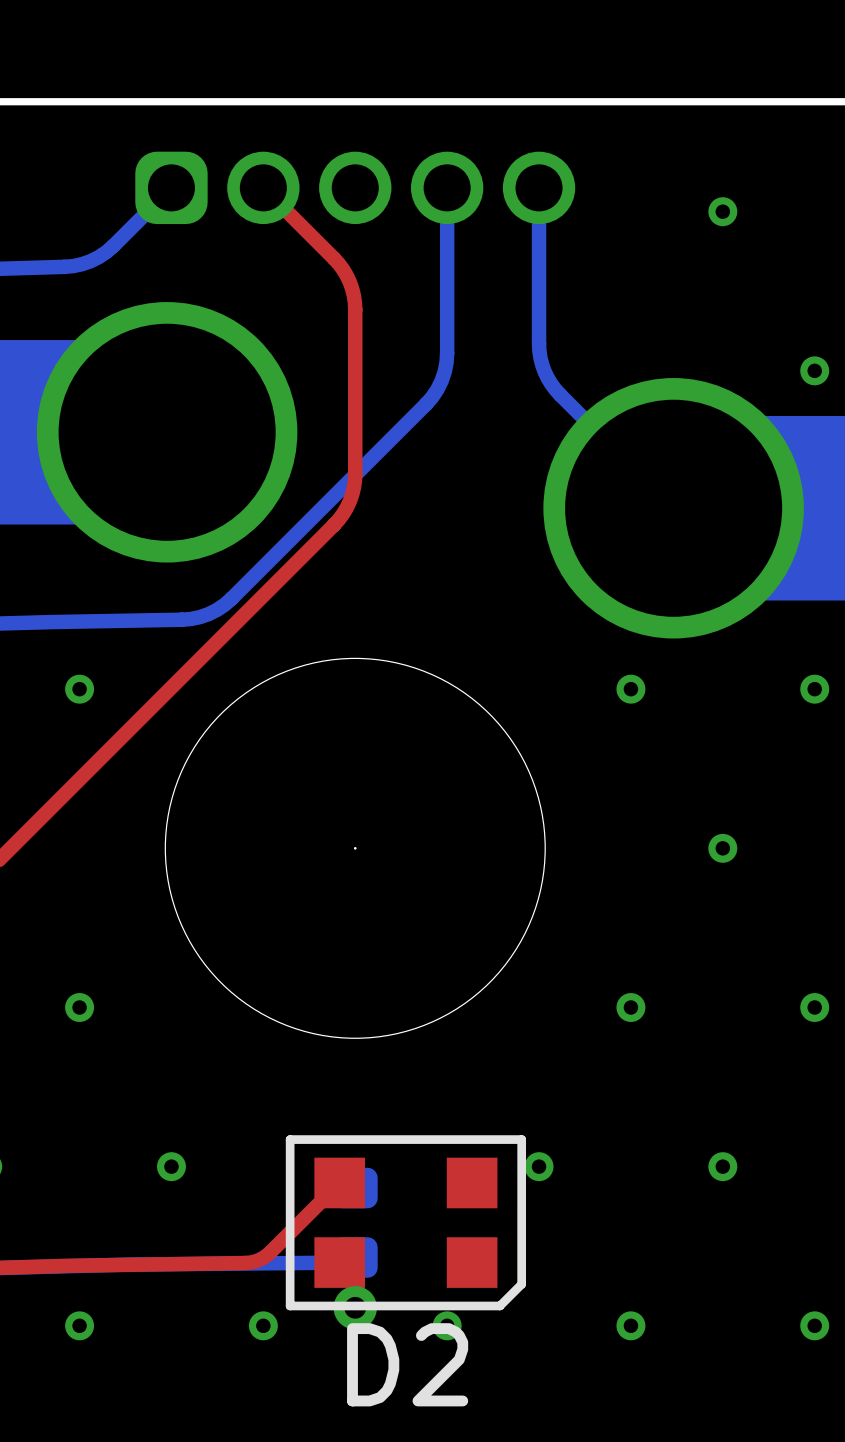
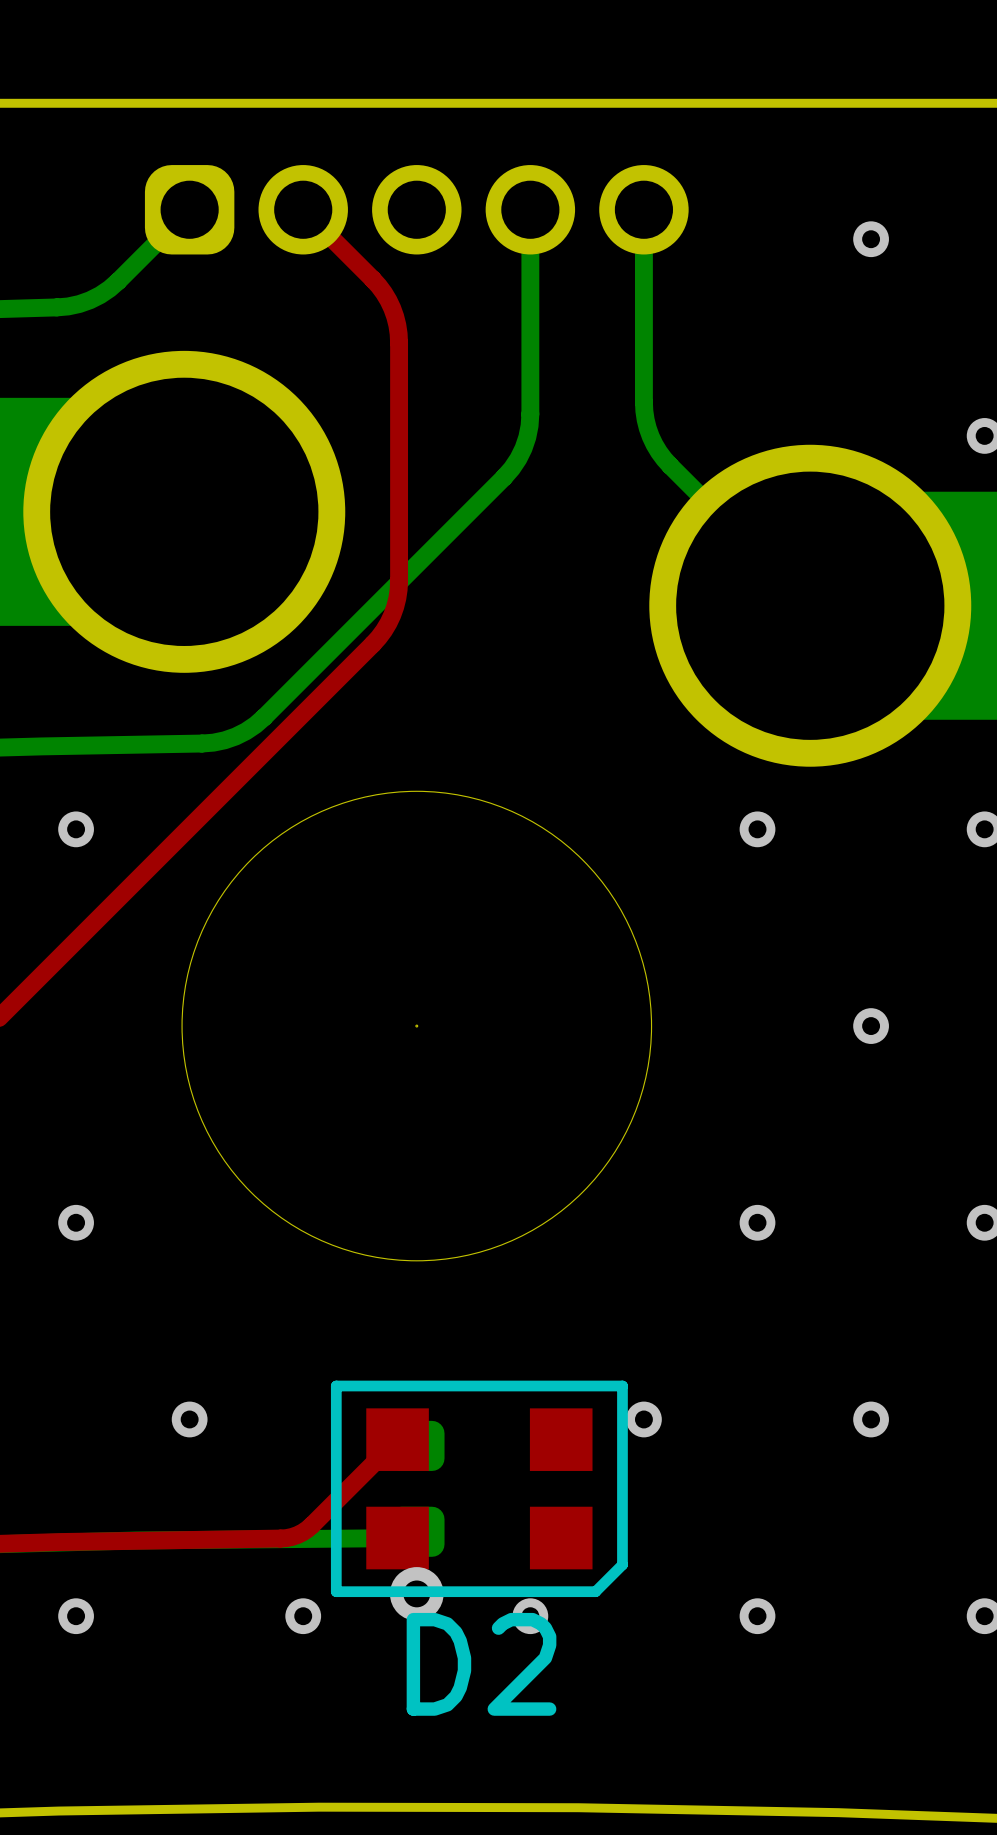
top track: (319, 244) (338, 263) (346, 275) (352, 288) (355, 309) (353, 487) (343, 513) (319, 539) -> (372, 279) (384, 292) (392, 308) (397, 325) (399, 342) (398, 589) (392, 615) (384, 630) (372, 644)

